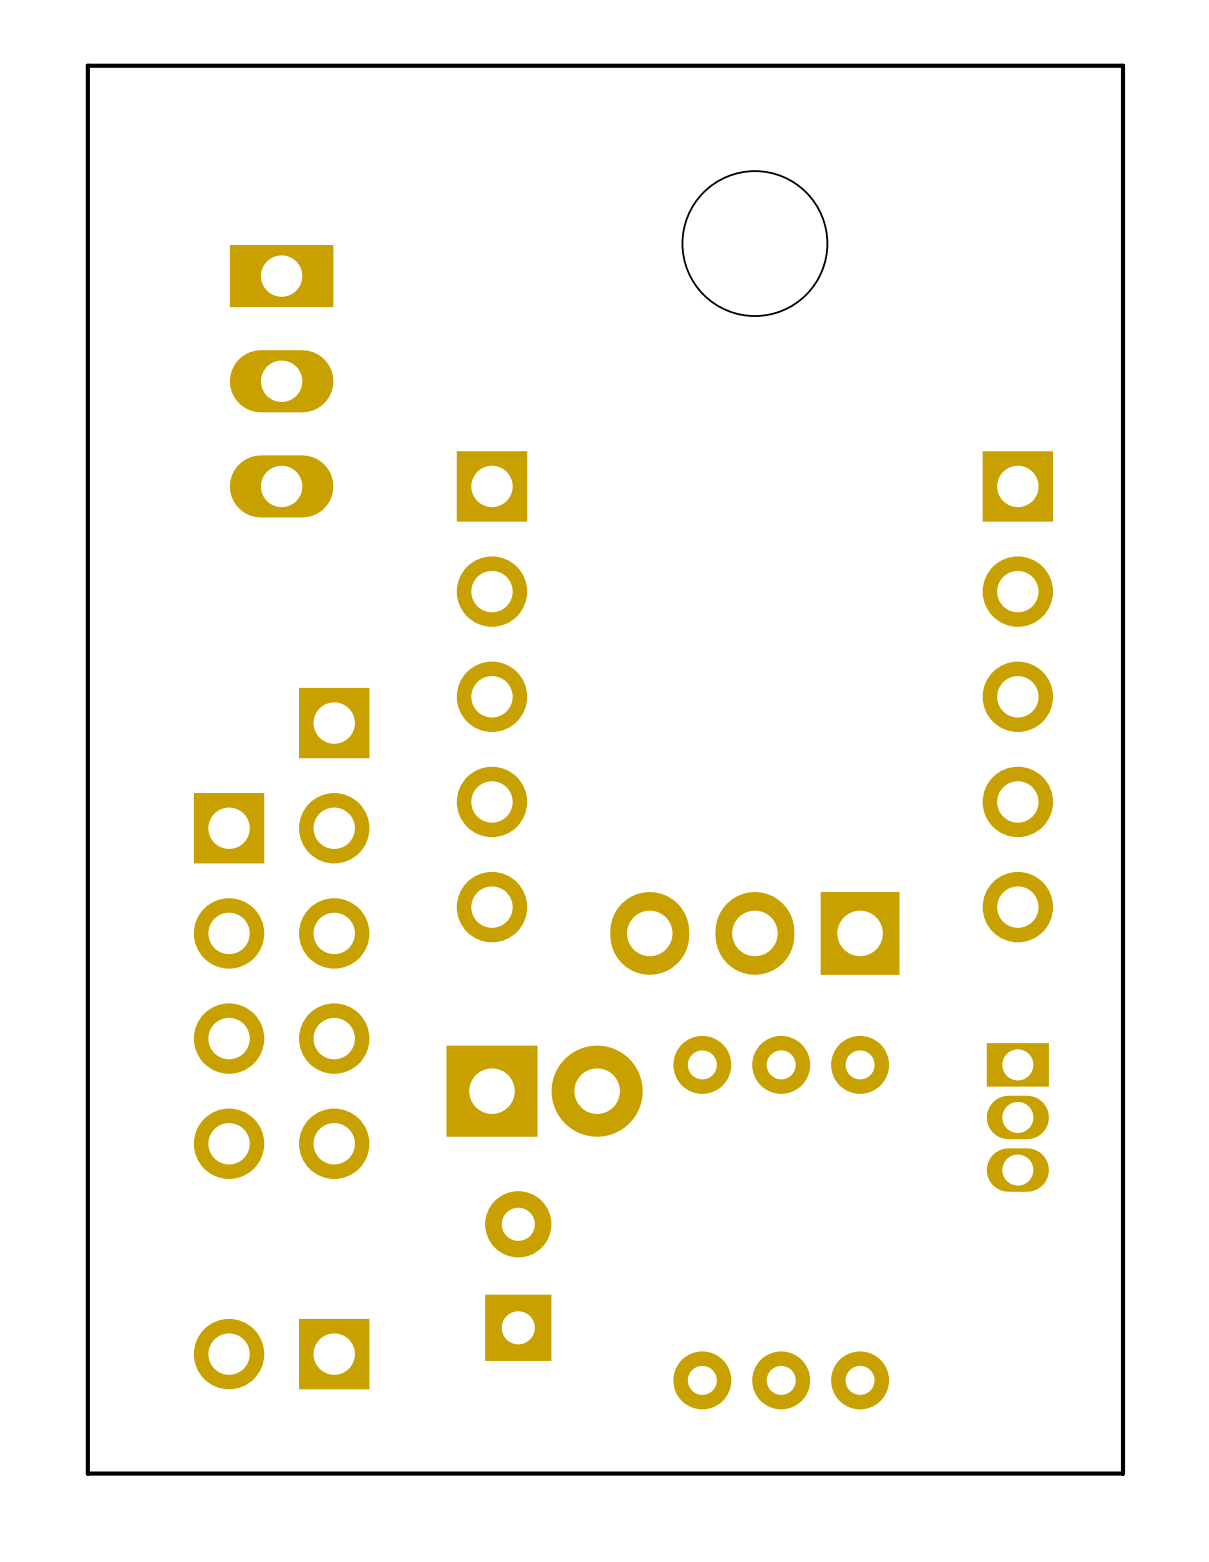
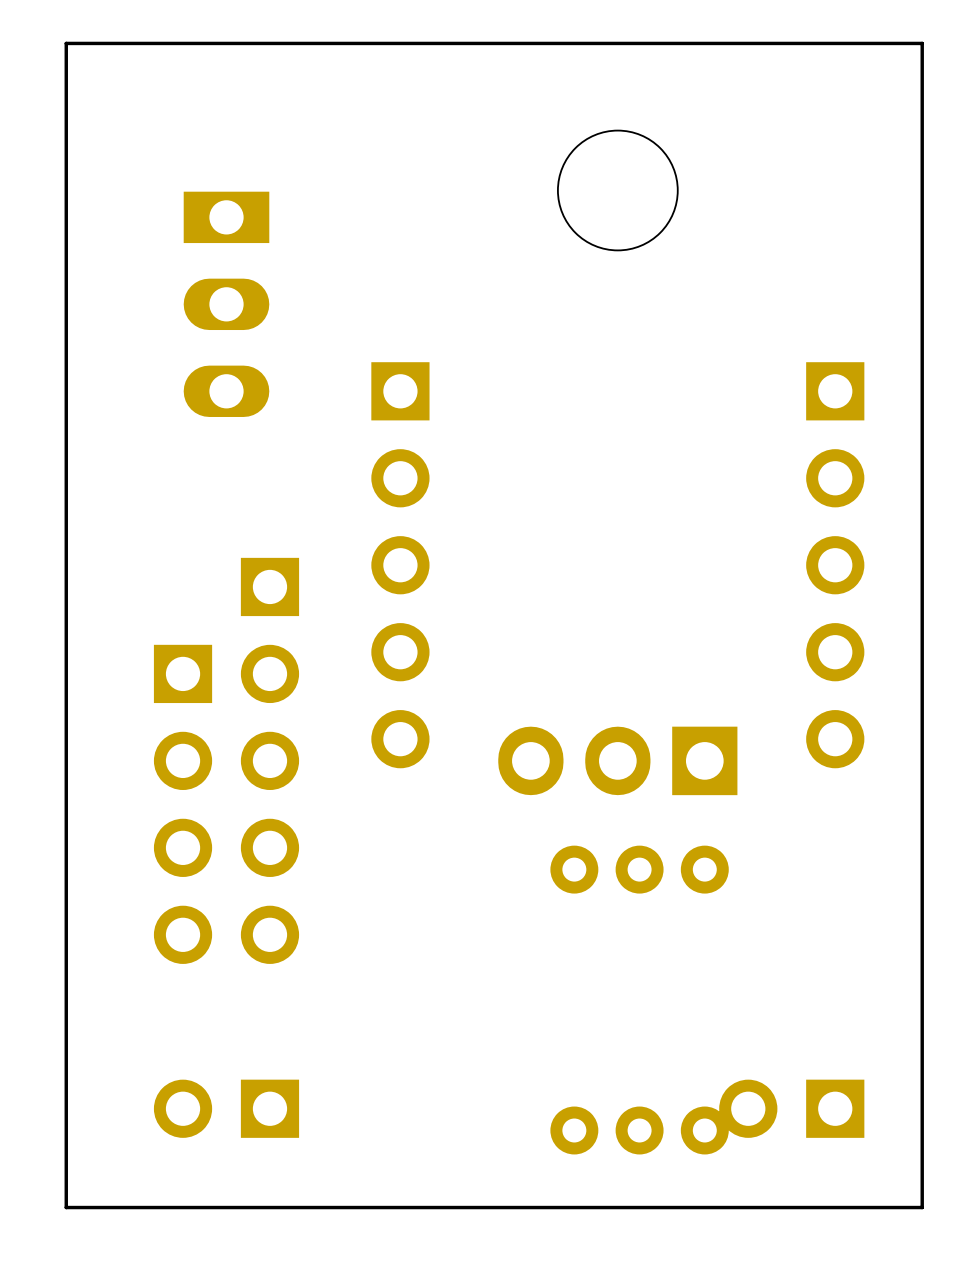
part: (544, 1091) -> none
part: (1017, 1117) -> none
part: (518, 1276) -> none
part: none -> (791, 1108)

